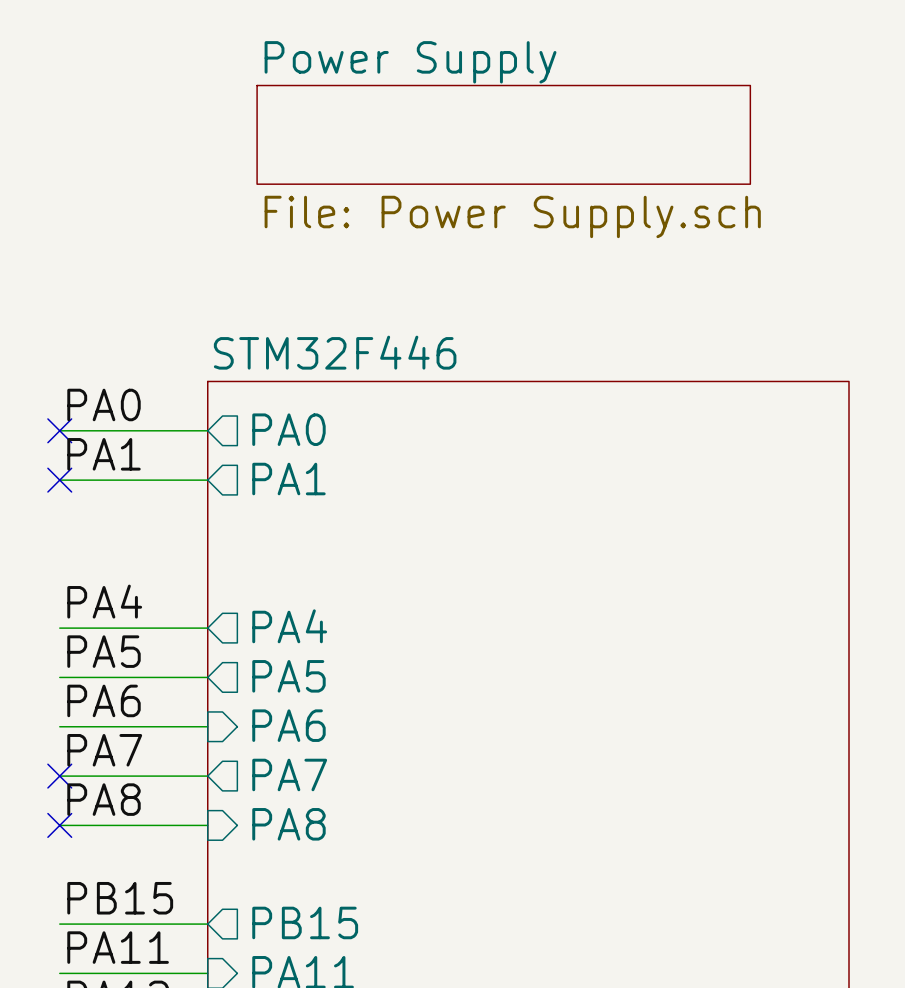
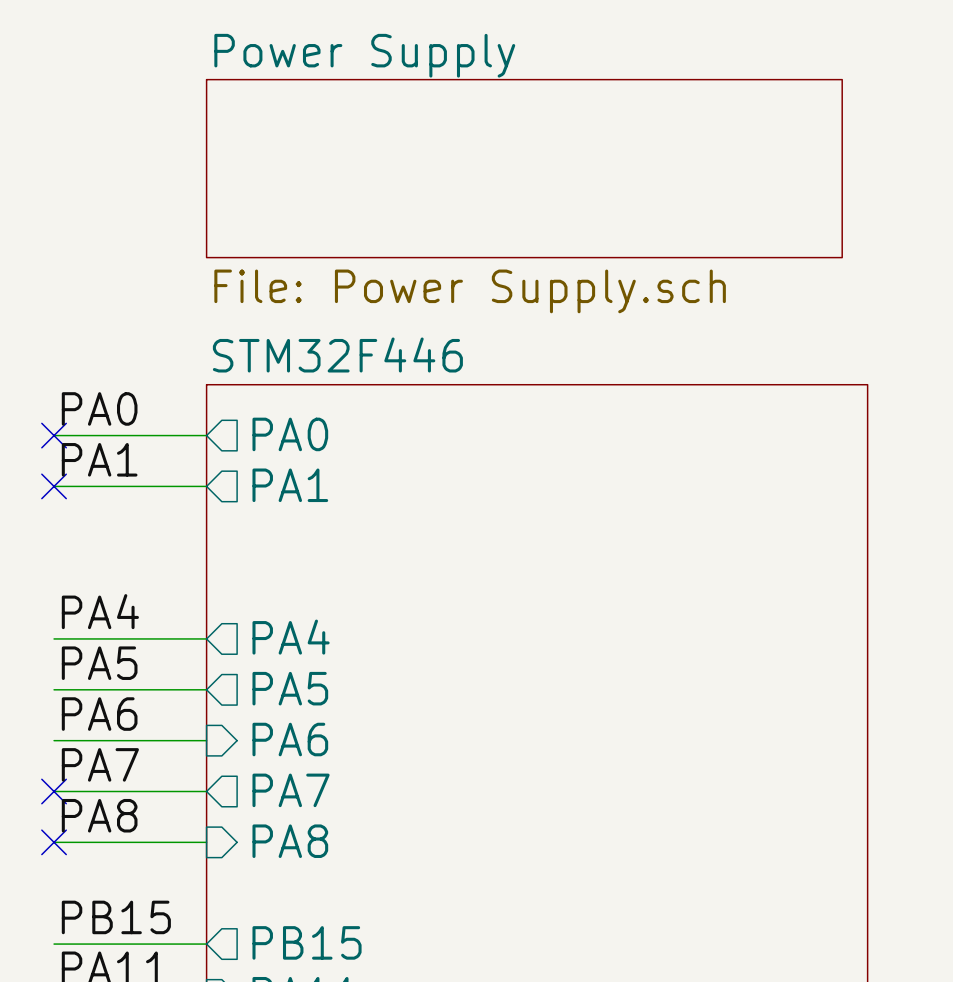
sheet Power Supply: File: Power Supply.sch (503, 134) -> none
sheet Power Supply: none -> File: Power Supply.sch (524, 168)

